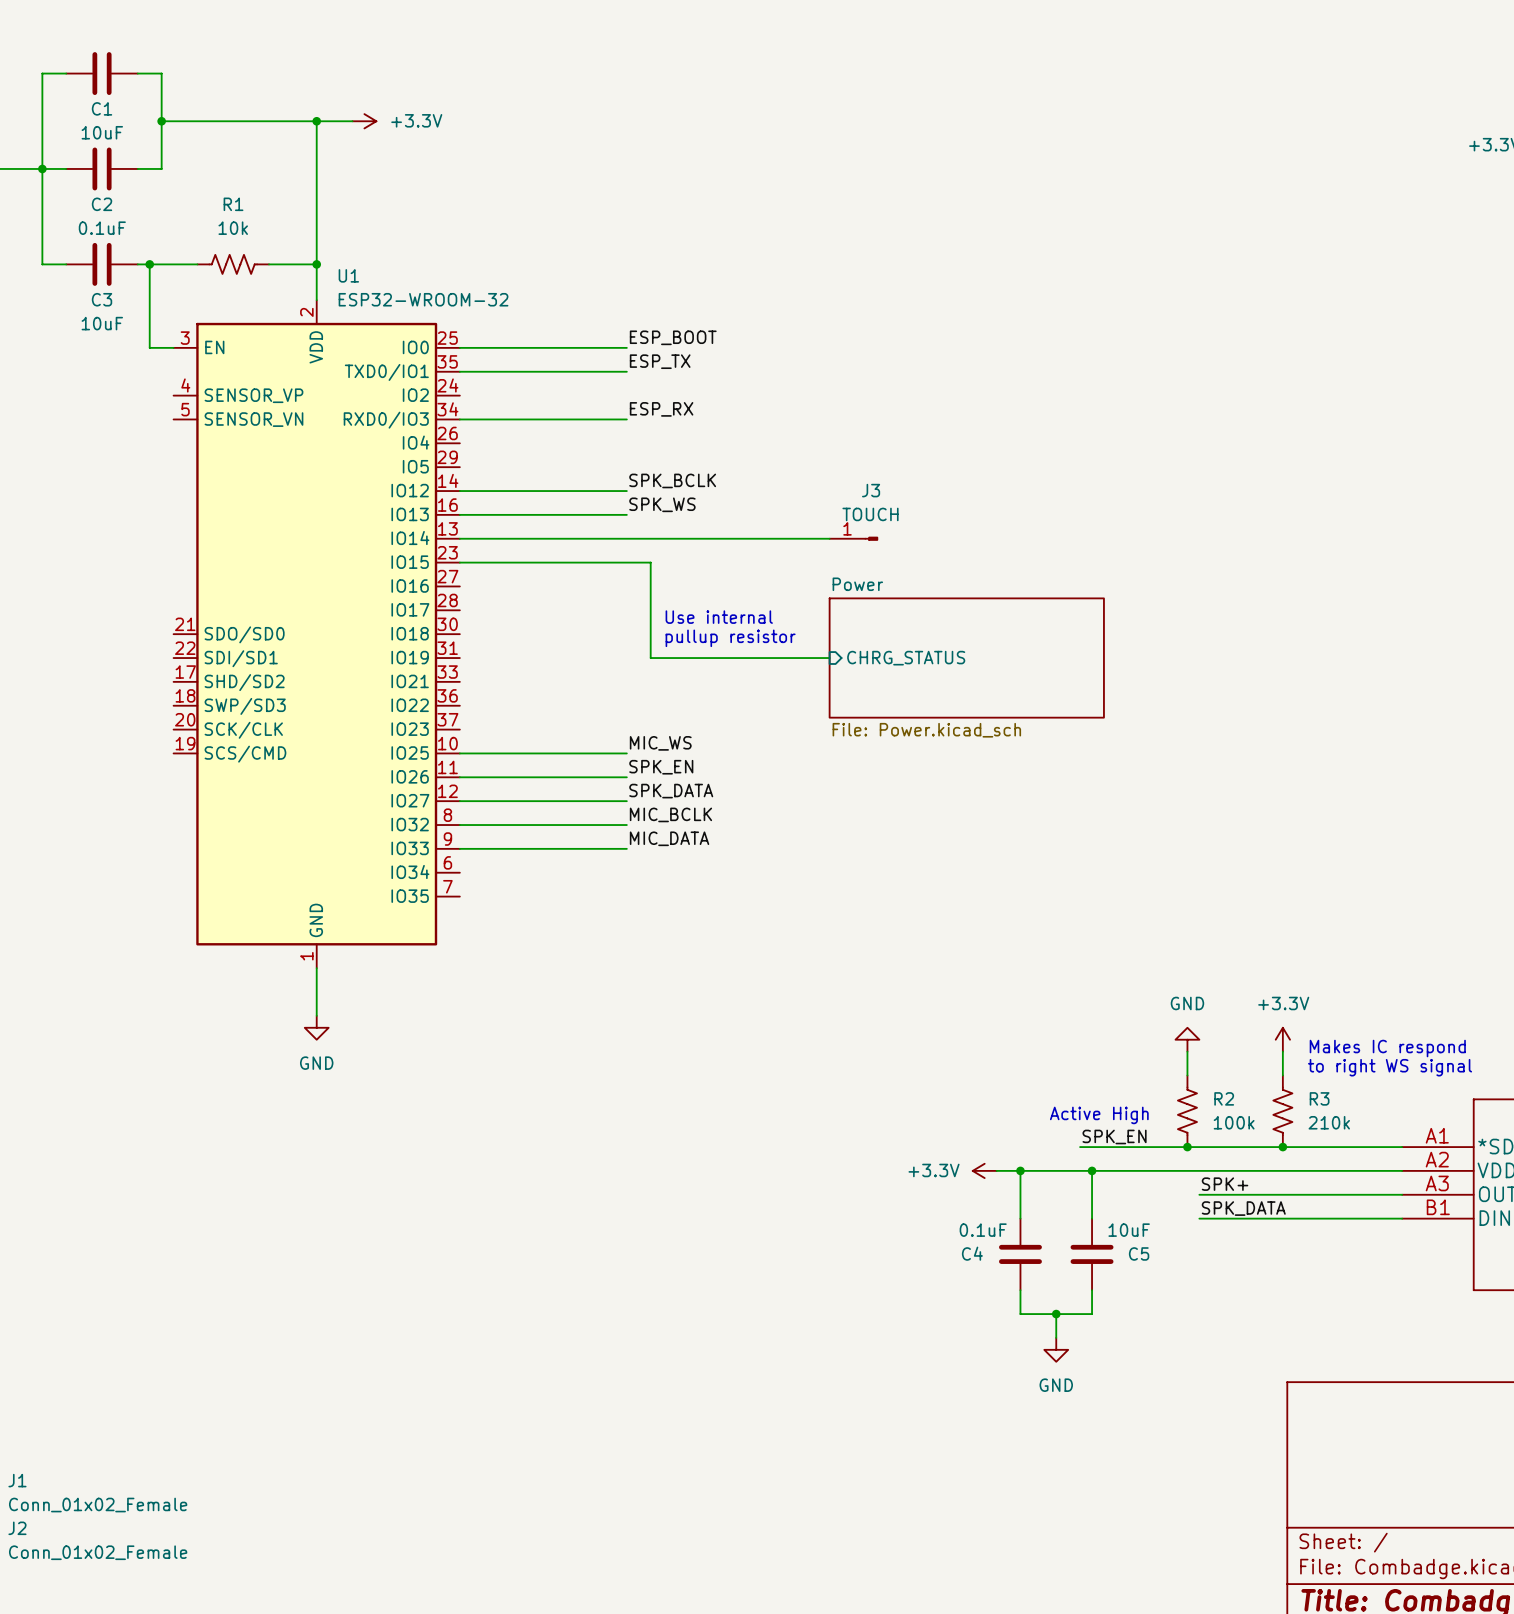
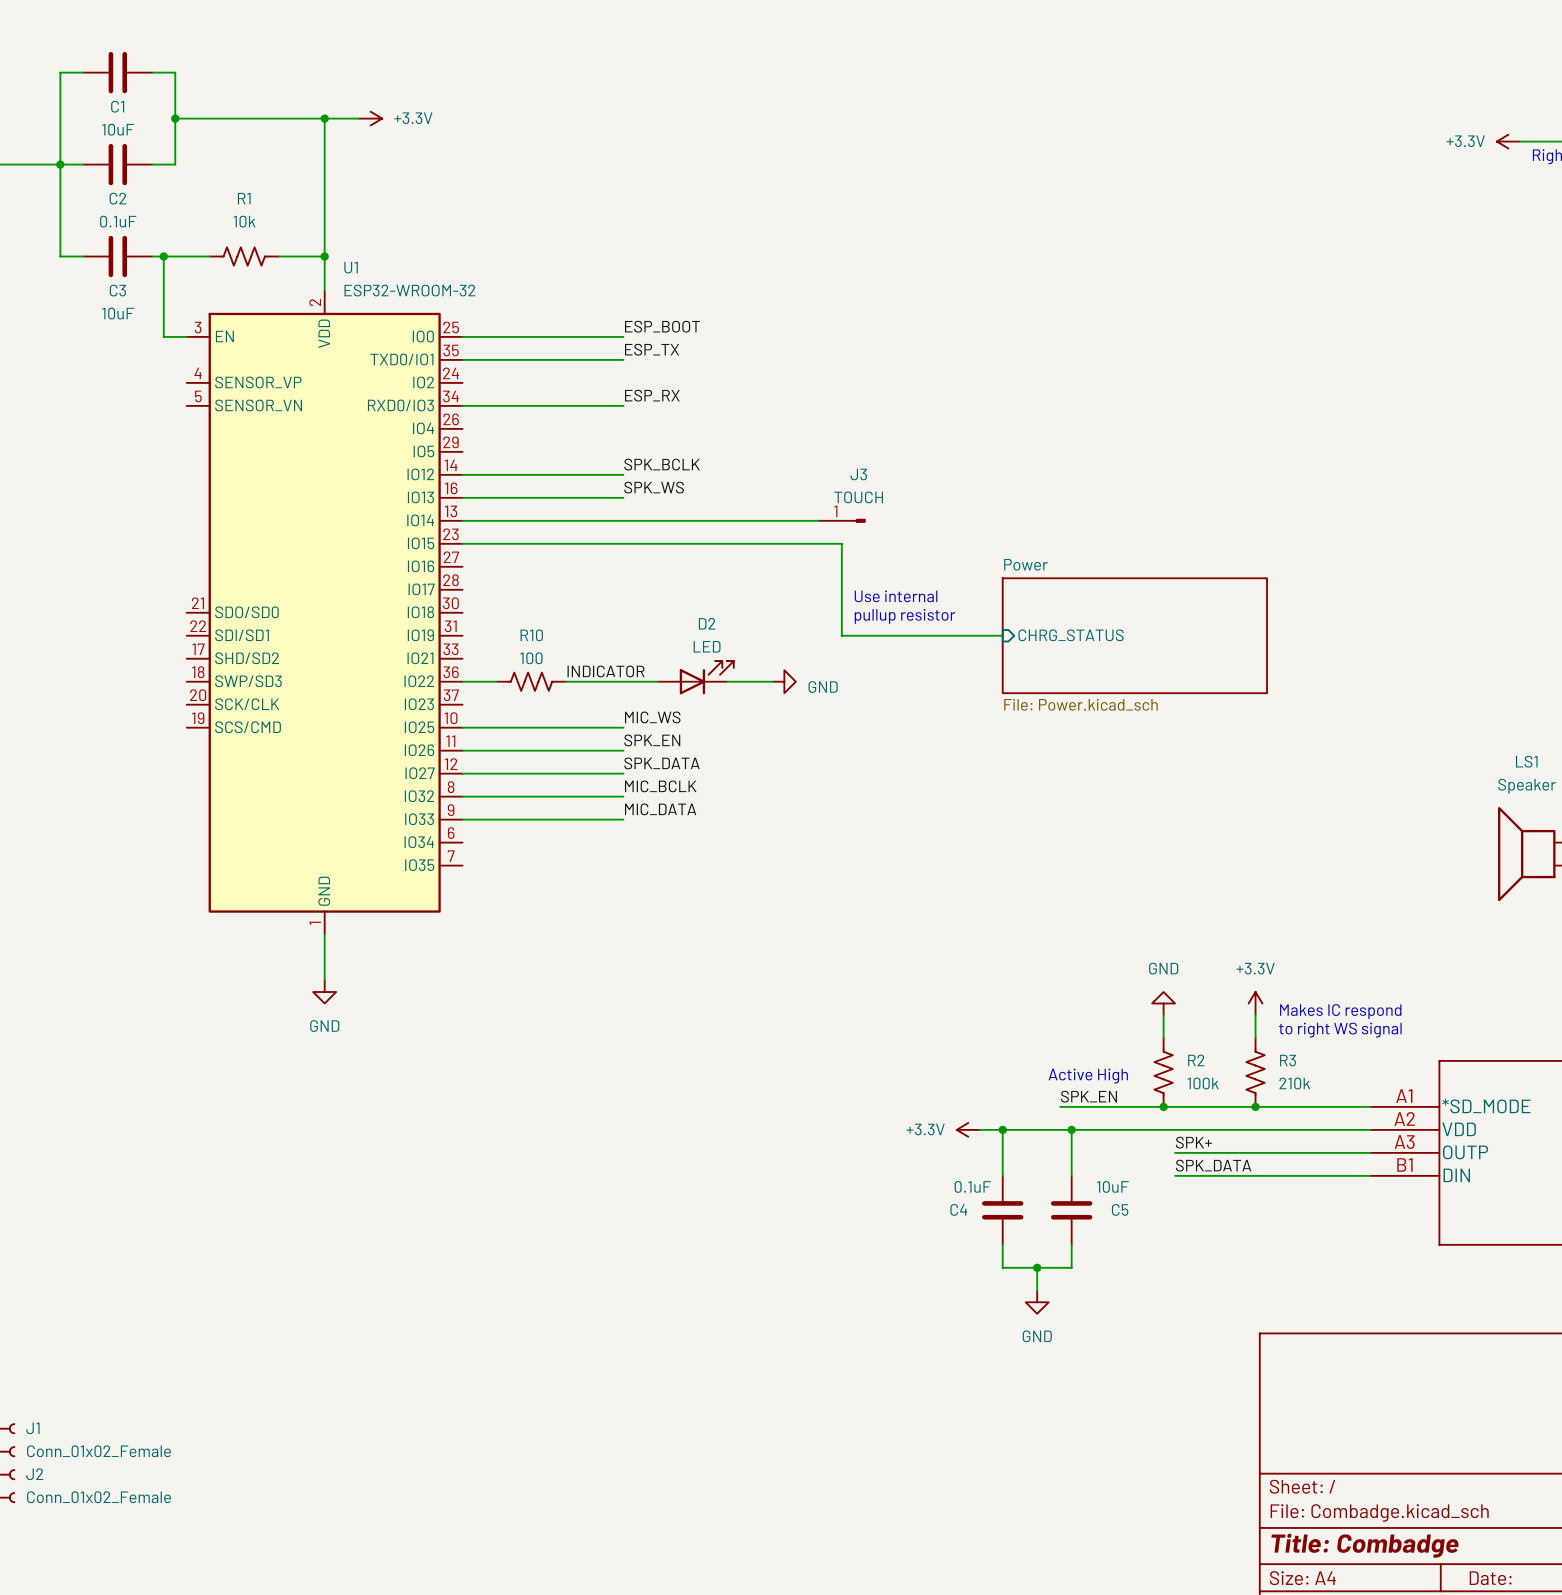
wire: (650, 562) (650, 658) (829, 658) -> (646, 543) (841, 543) (841, 635) (1002, 635)
text position: Use internal (719, 617) -> Use internal (896, 596)
text position: pullup resistor (730, 638) -> pullup resistor (904, 616)
sheet pin position: CHRG_STATUS (906, 658) -> CHRG_STATUS (1071, 635)
sheet Power position: (966, 658) -> (1134, 635)
label: none -> INDICATOR (606, 671)
D2: none -> LED (695, 677)
wire: none -> (462, 681) (497, 681)
R10: none -> 100 (531, 681)
wire: none -> (566, 681) (657, 681)
wire: none -> (726, 681) (772, 681)
power symbol: none -> GND (784, 681)

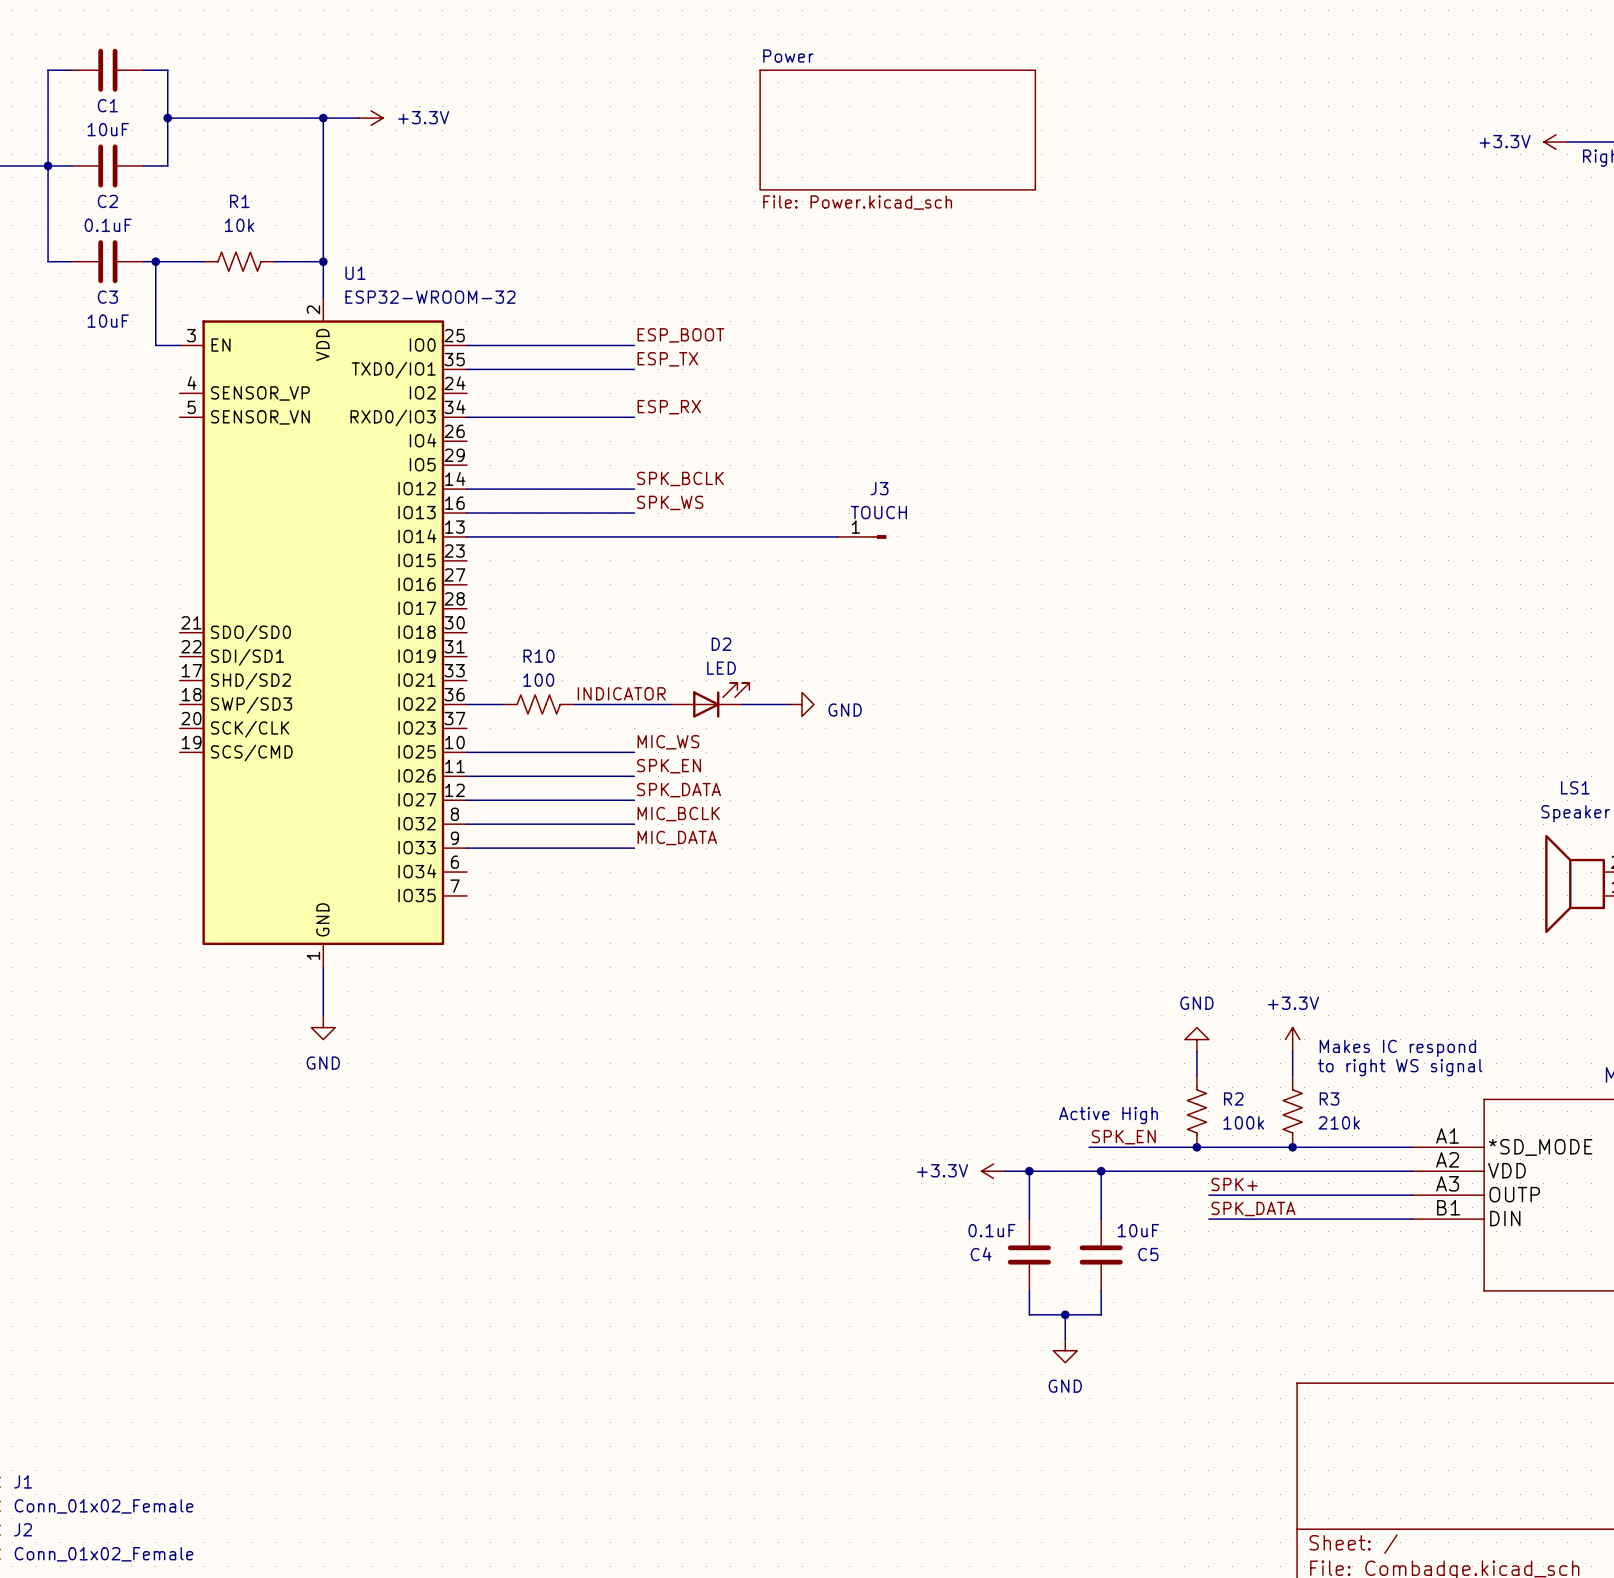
sheet Power: none -> File: Power.kicad_sch (897, 130)
wire: (462, 543) (841, 543) (841, 635) (1002, 635) -> none
text: Use internal (896, 596) -> none
text: pullup resistor (904, 616) -> none
sheet pin: CHRG_STATUS (1071, 635) -> none
sheet Power: File: Power.kicad_sch (1134, 635) -> none

